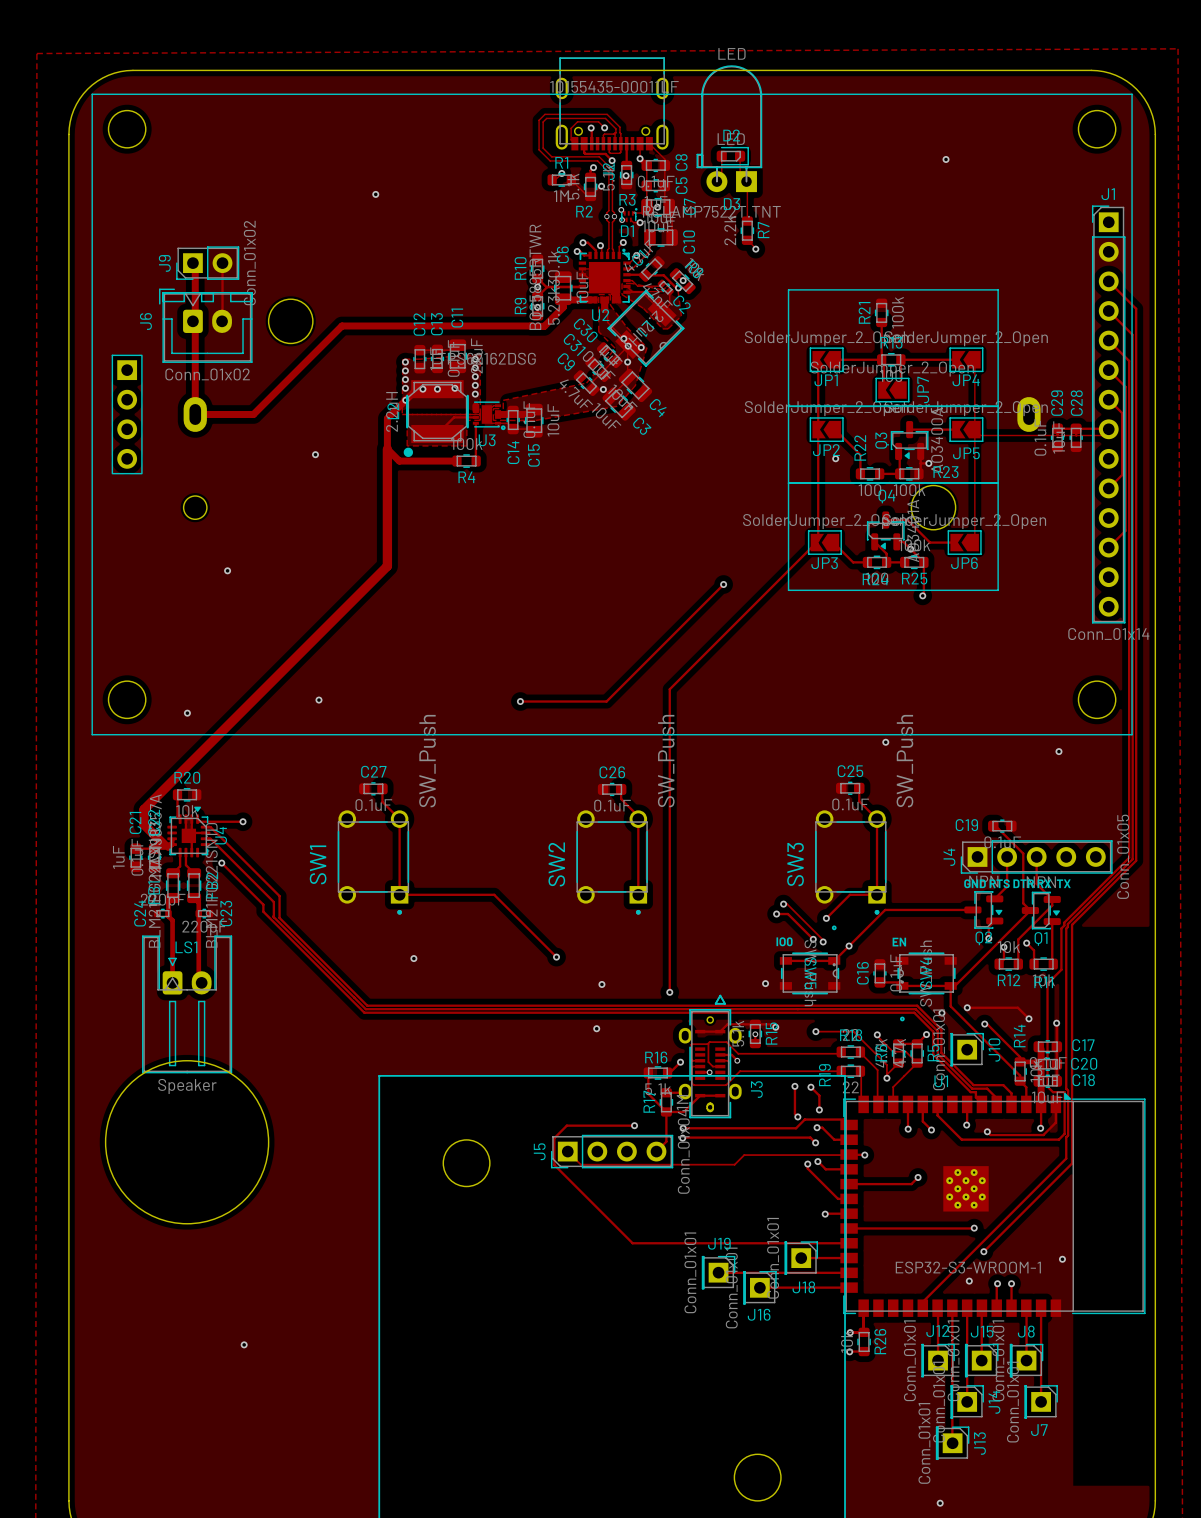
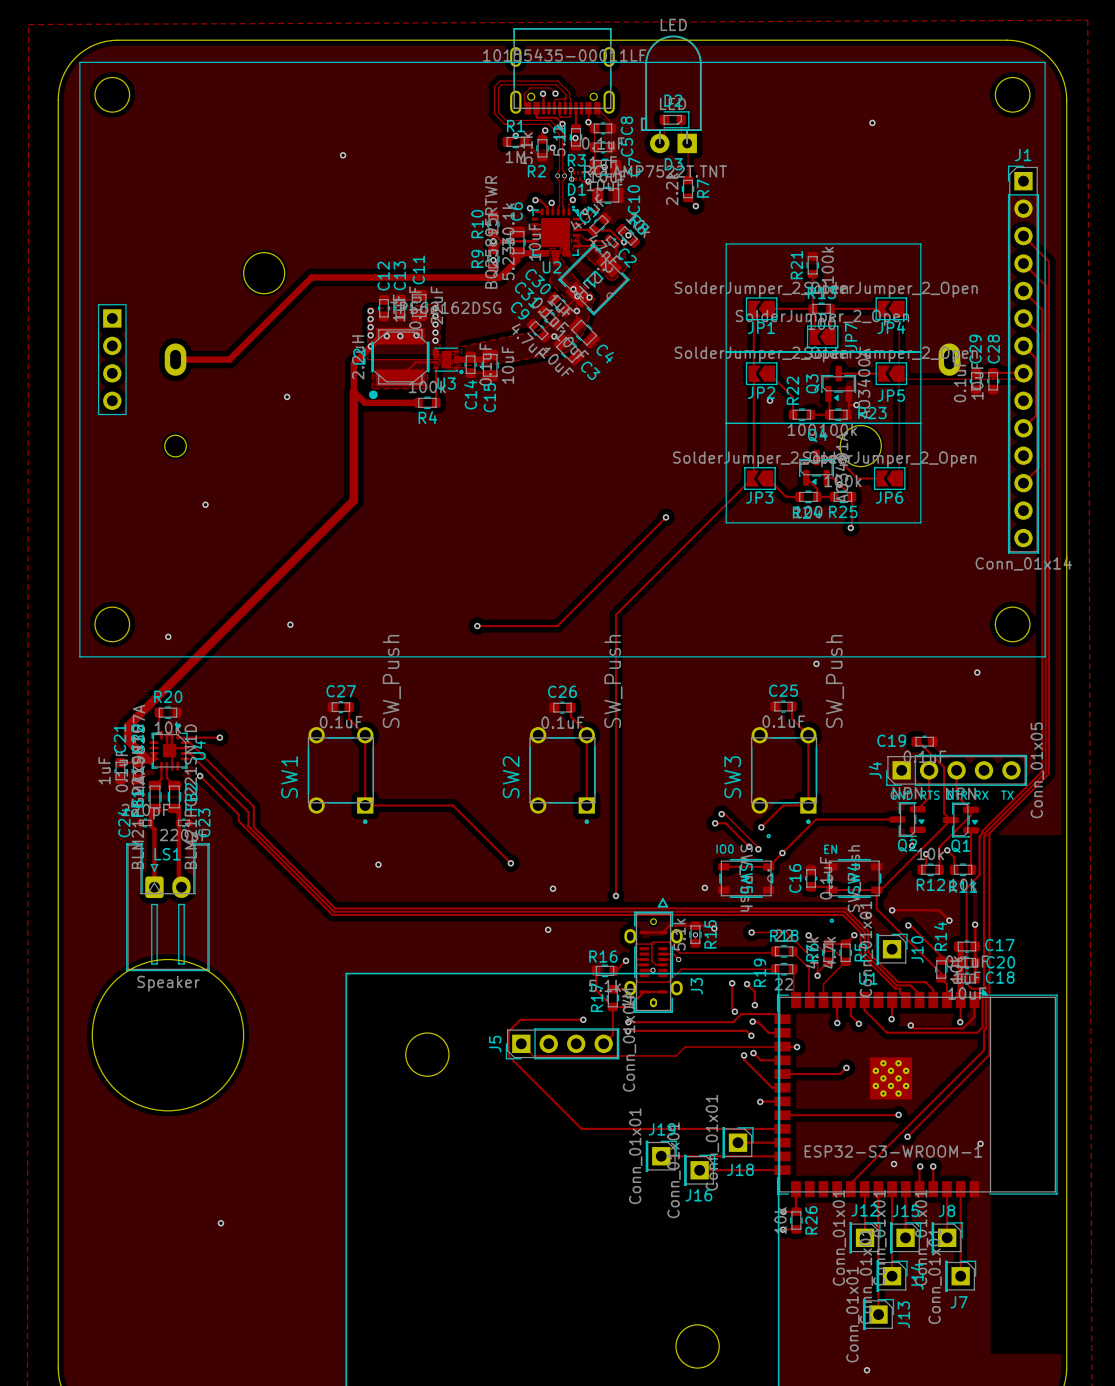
track: (192, 263) (195, 265) (195, 414) -> none
J9: Conn_01x02 (207, 263) -> none
track: (222, 263) (222, 321) -> none
J6: Conn_01x02 (205, 325) -> none

